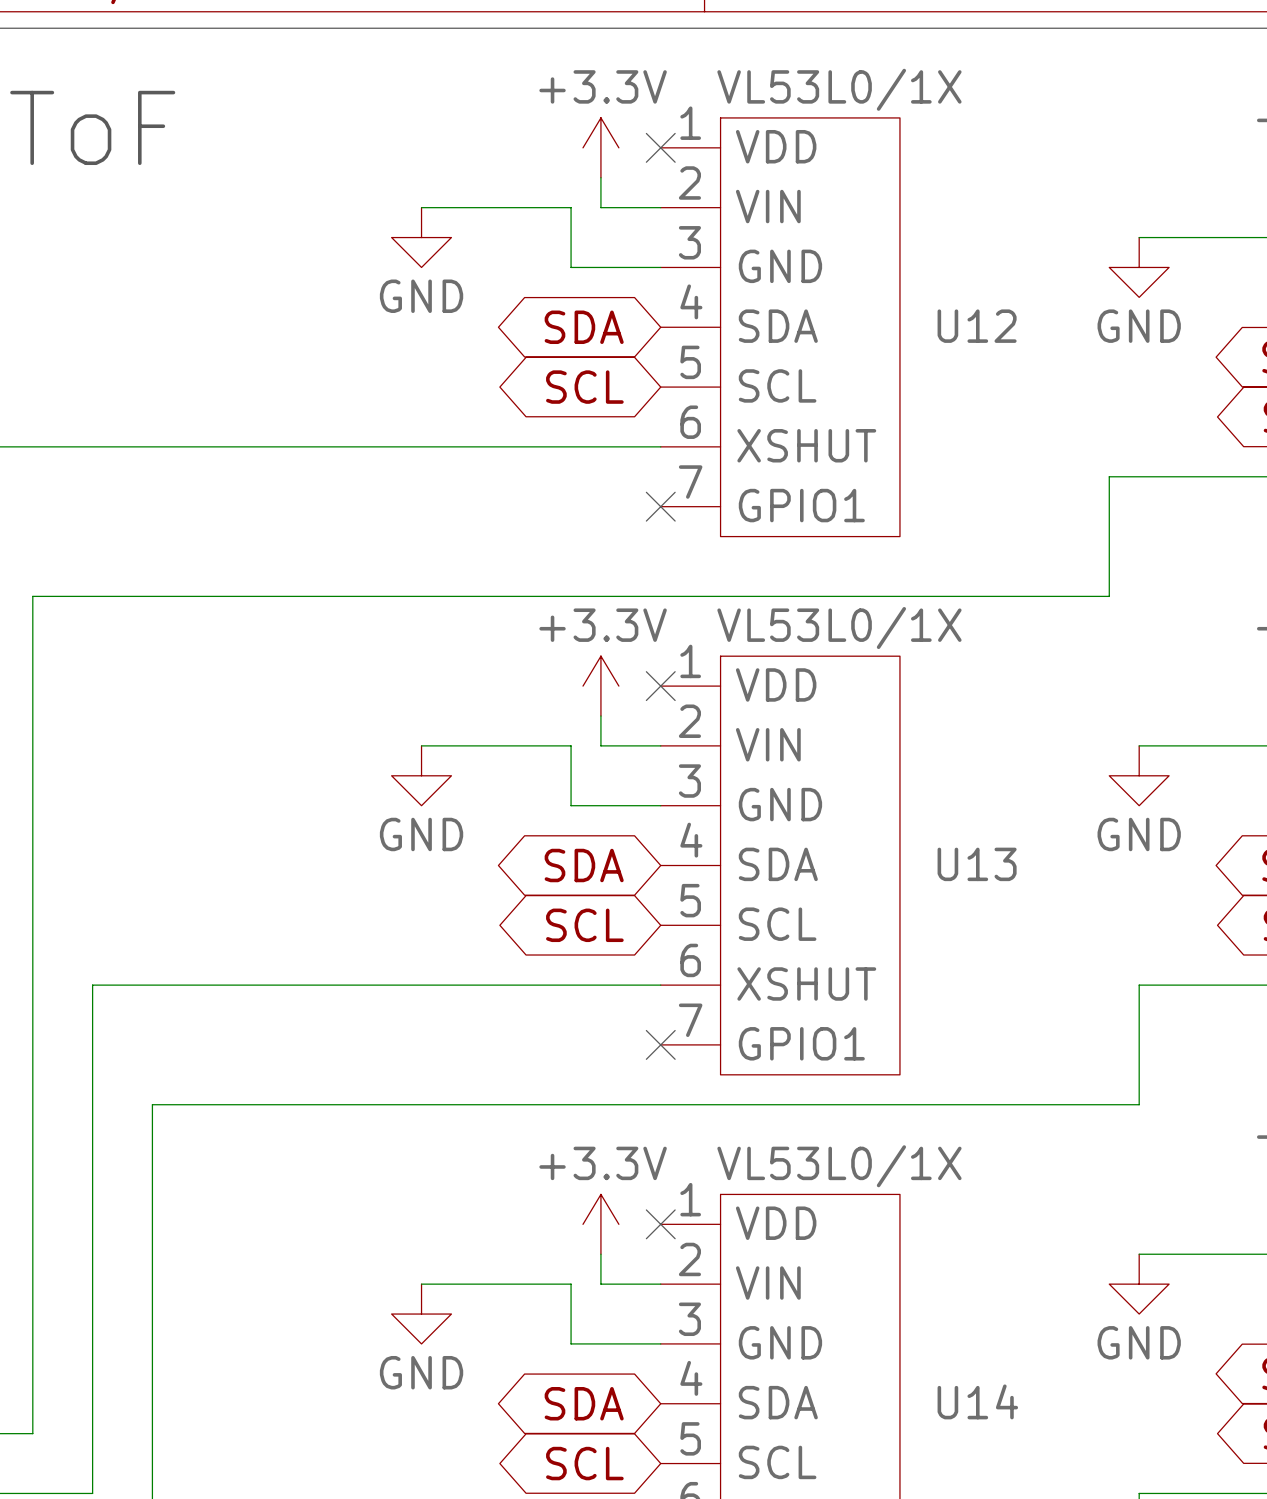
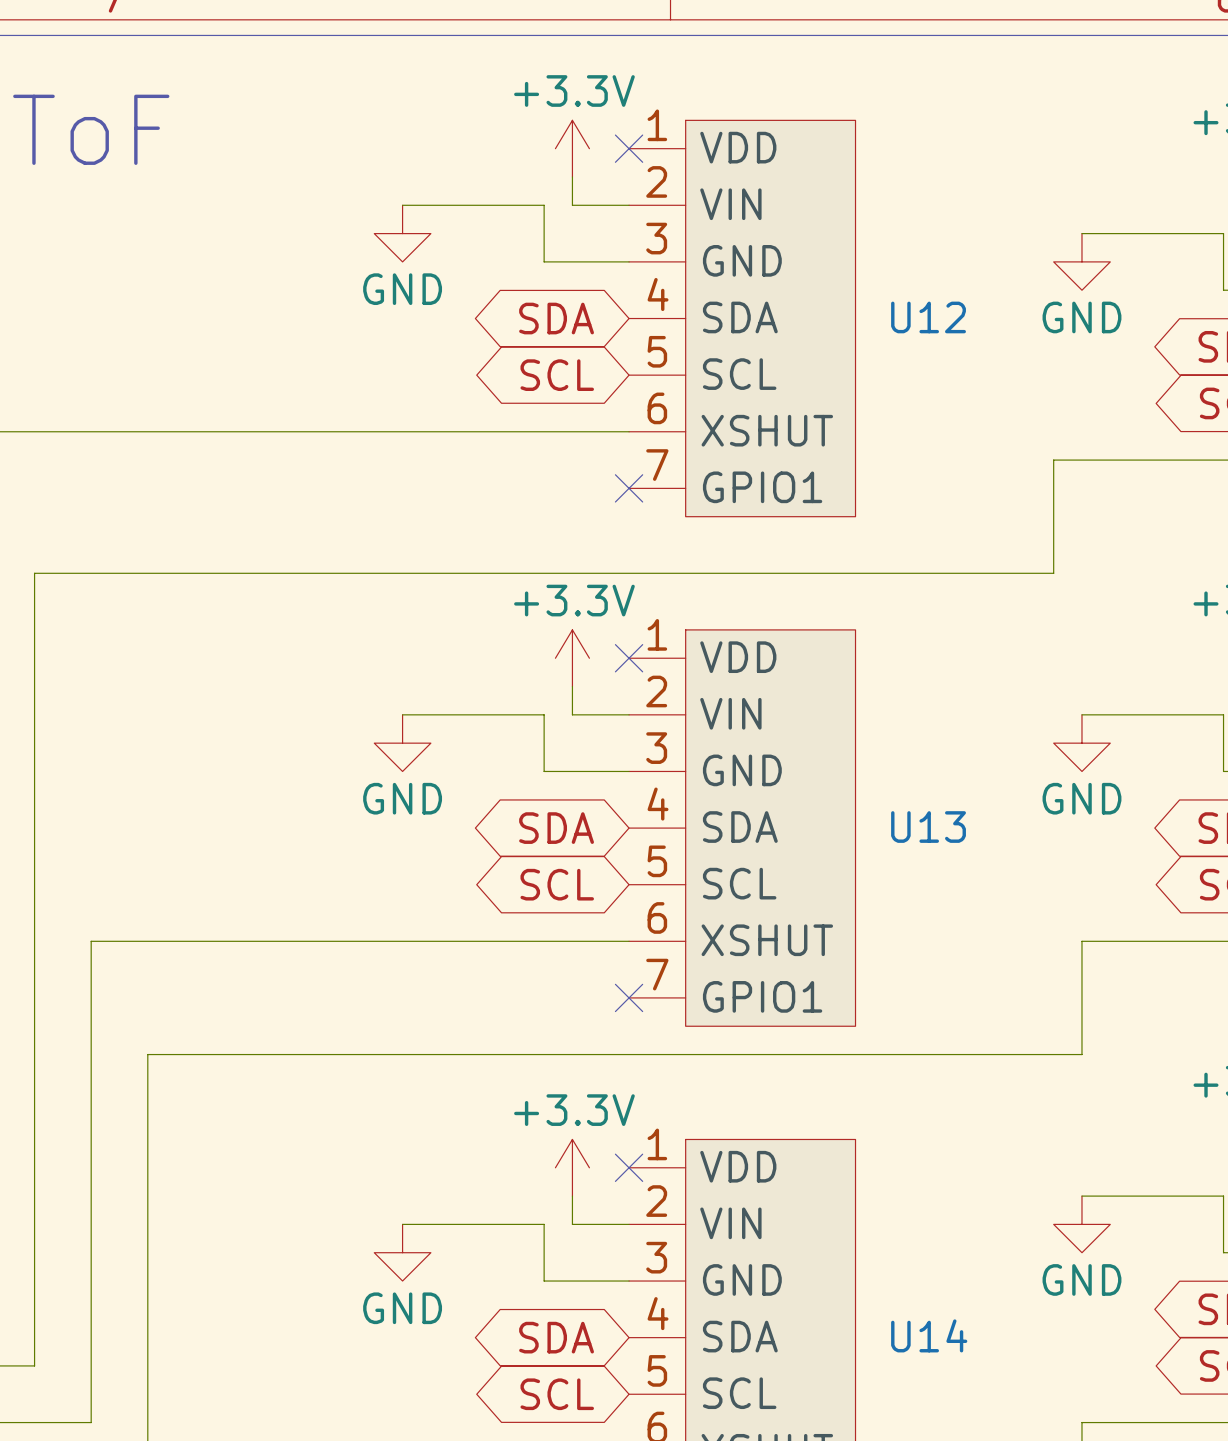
U12 value: VL53L0/1X (839, 89) -> none
U13 value: VL53L0/1X (839, 628) -> none
U14 value: VL53L0/1X (839, 1166) -> none

